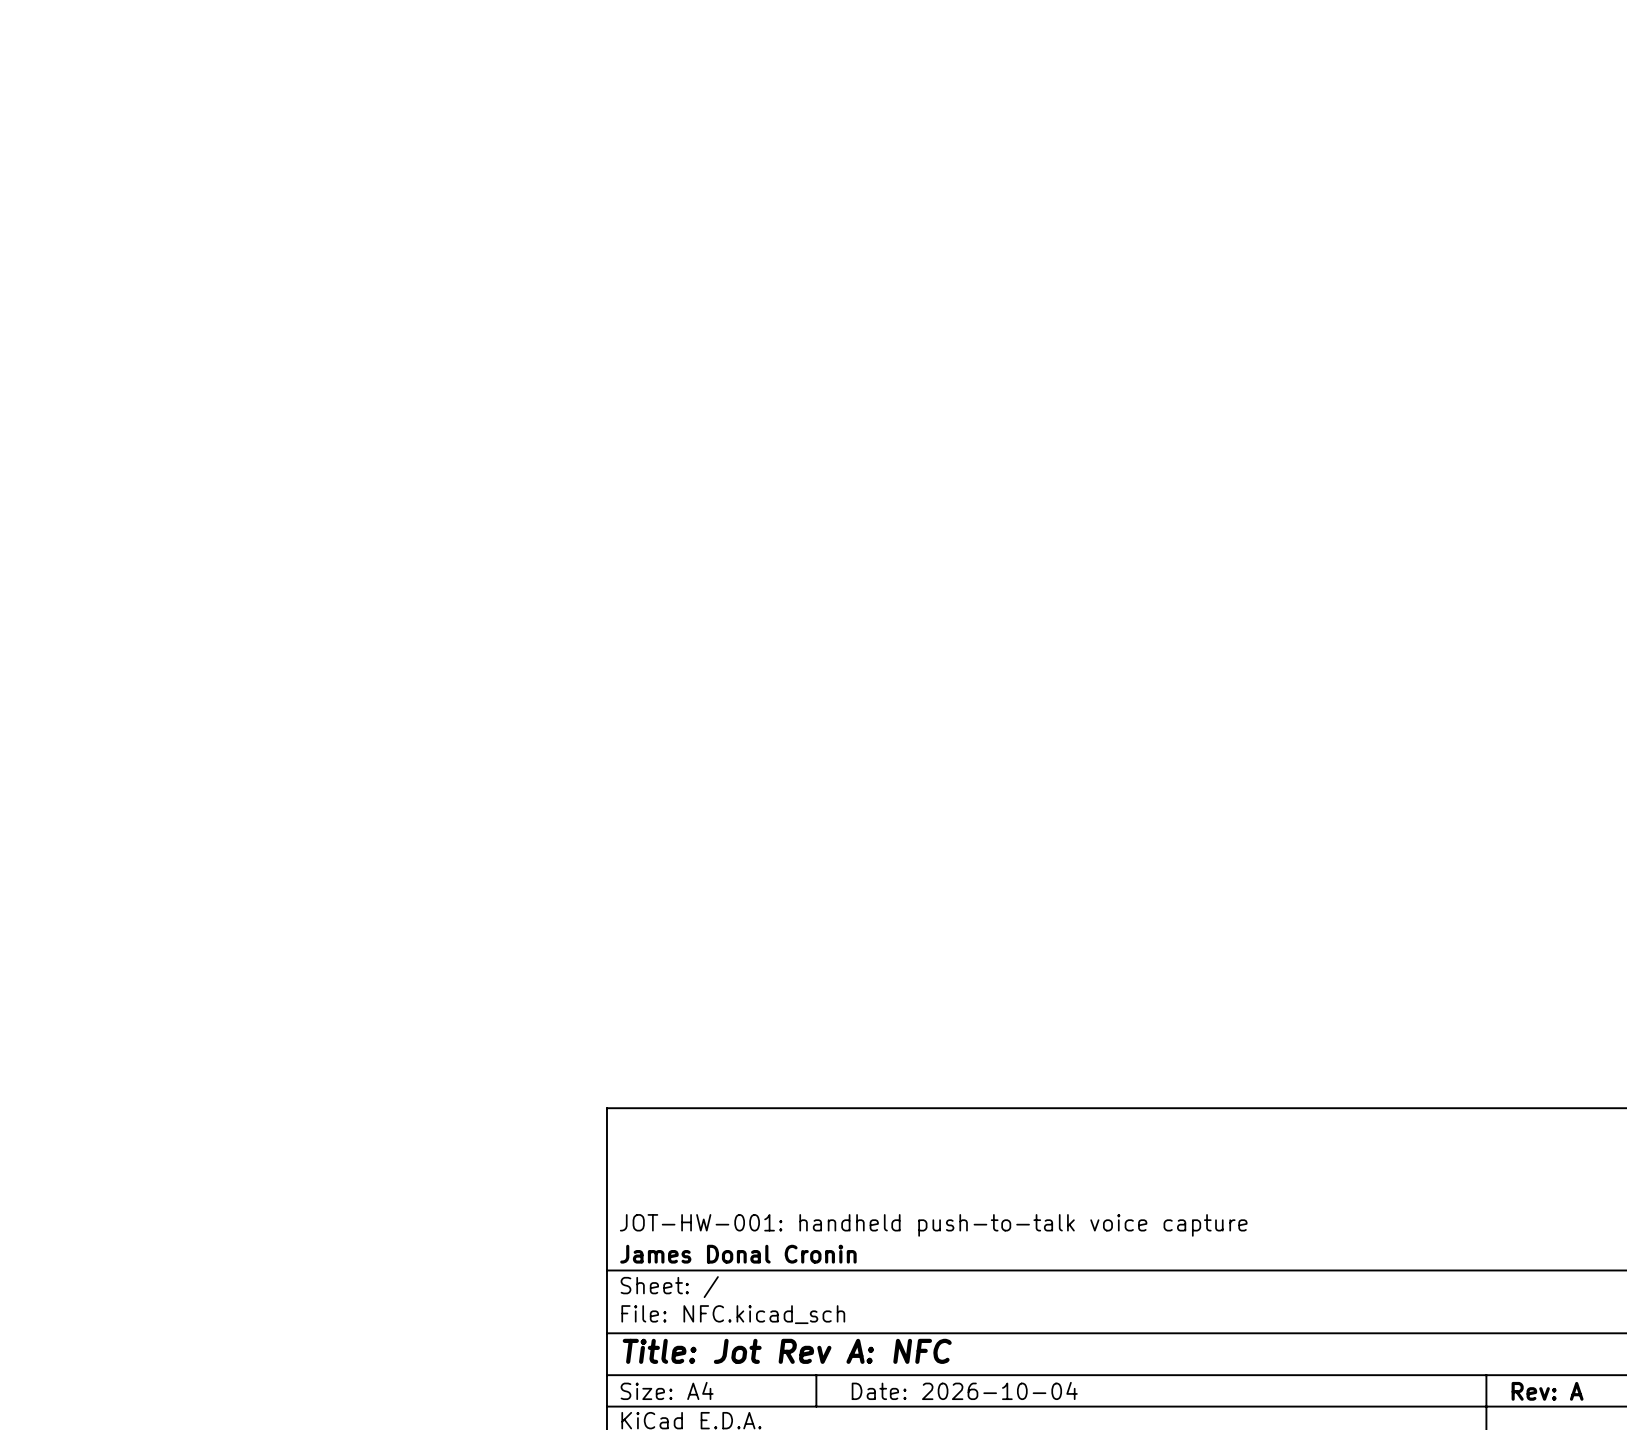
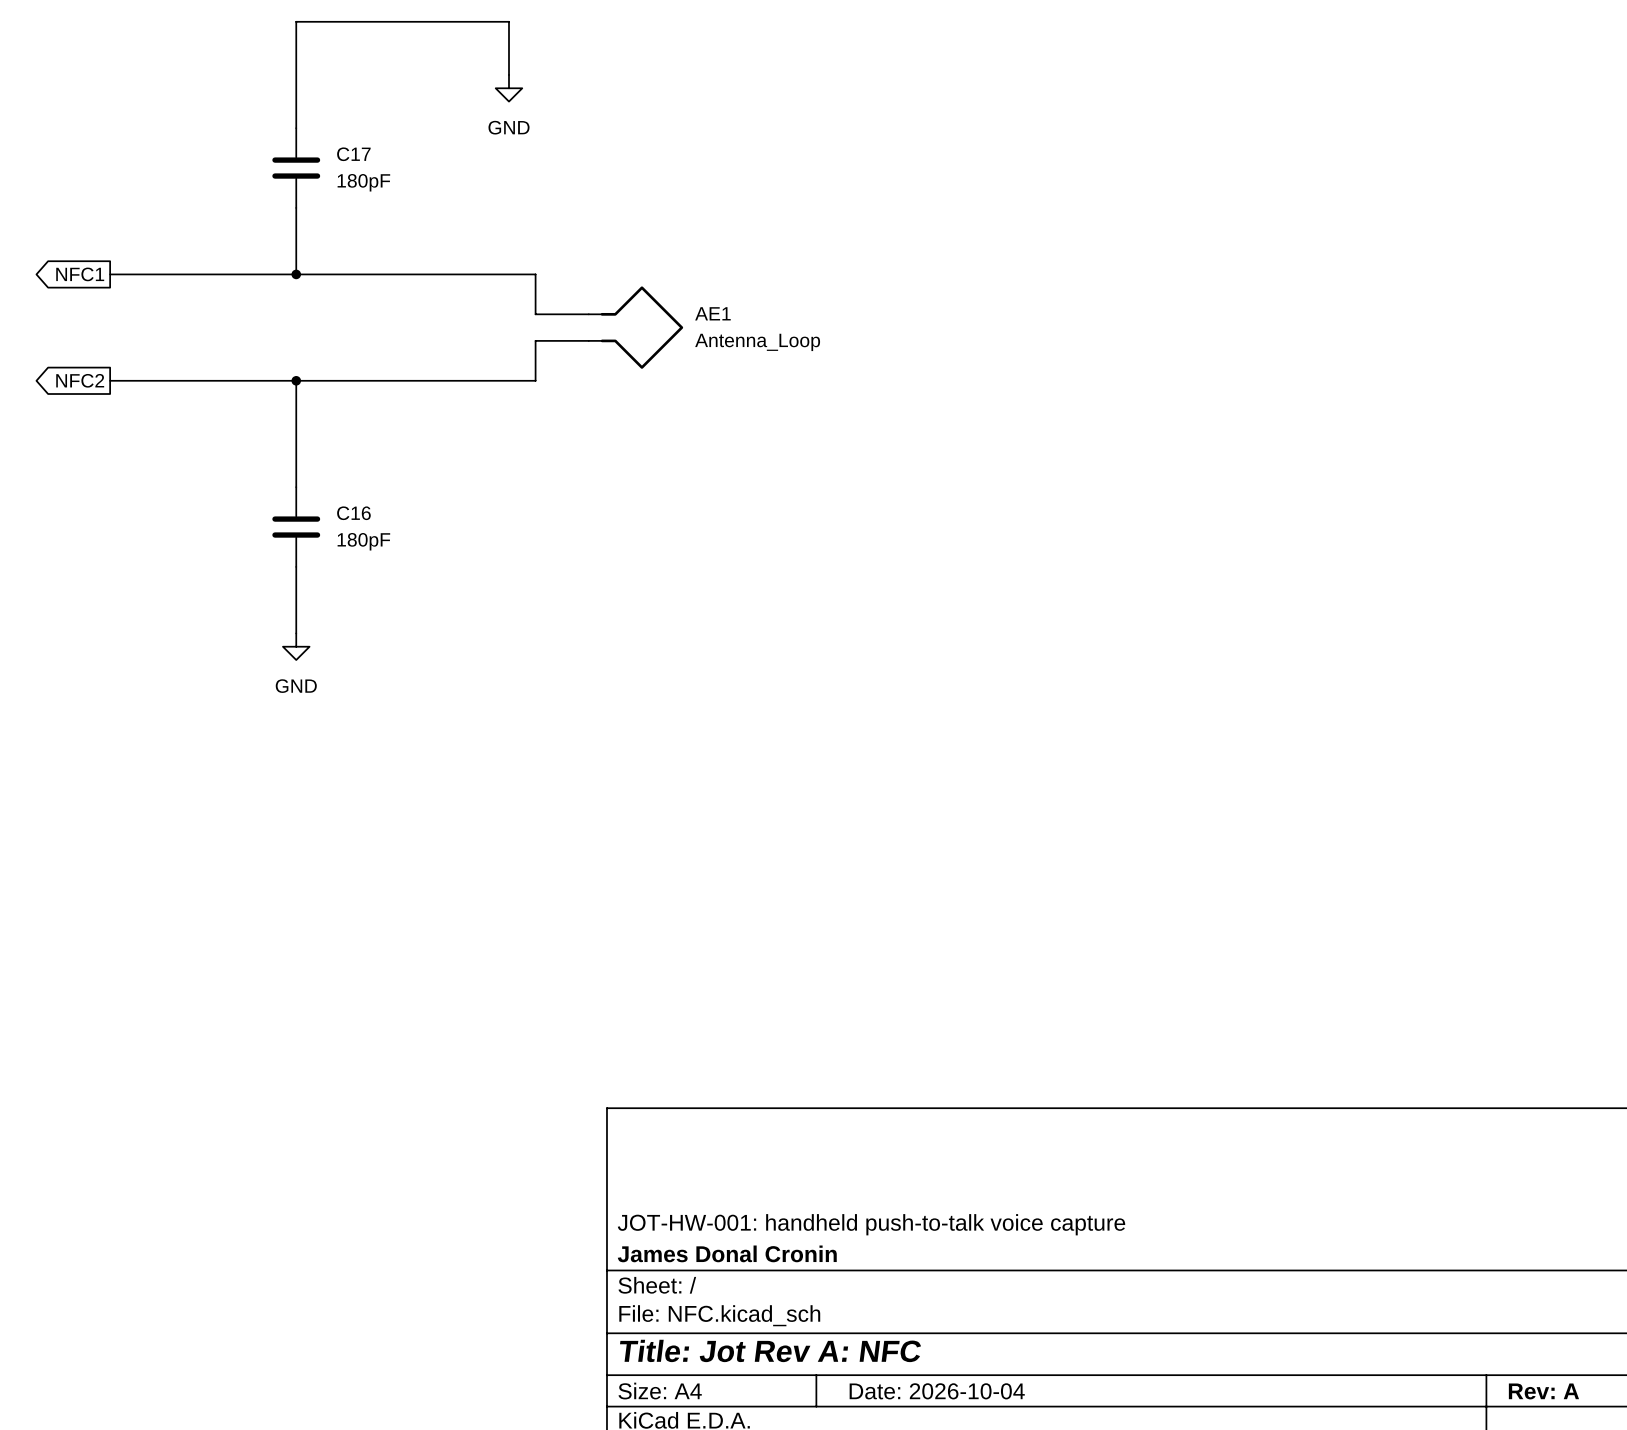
wire: none -> (508, 74) (508, 21) (296, 21) (296, 128)
power symbol: none -> GND (508, 88)
C17: none -> 180pF (296, 168)
wire: none -> (296, 207) (296, 274)
global label: none -> NFC1 (80, 274)
wire: none -> (110, 274) (535, 274) (535, 314) (588, 314)
junction: none -> (296, 274)
AE1: none -> Antenna_Loop (635, 327)
wire: none -> (588, 340) (535, 340) (535, 380) (110, 380)
global label: none -> NFC2 (80, 380)
wire: none -> (296, 380) (296, 487)
junction: none -> (296, 380)
C16: none -> 180pF (296, 527)
wire: none -> (296, 566) (296, 633)
power symbol: none -> GND (296, 646)

